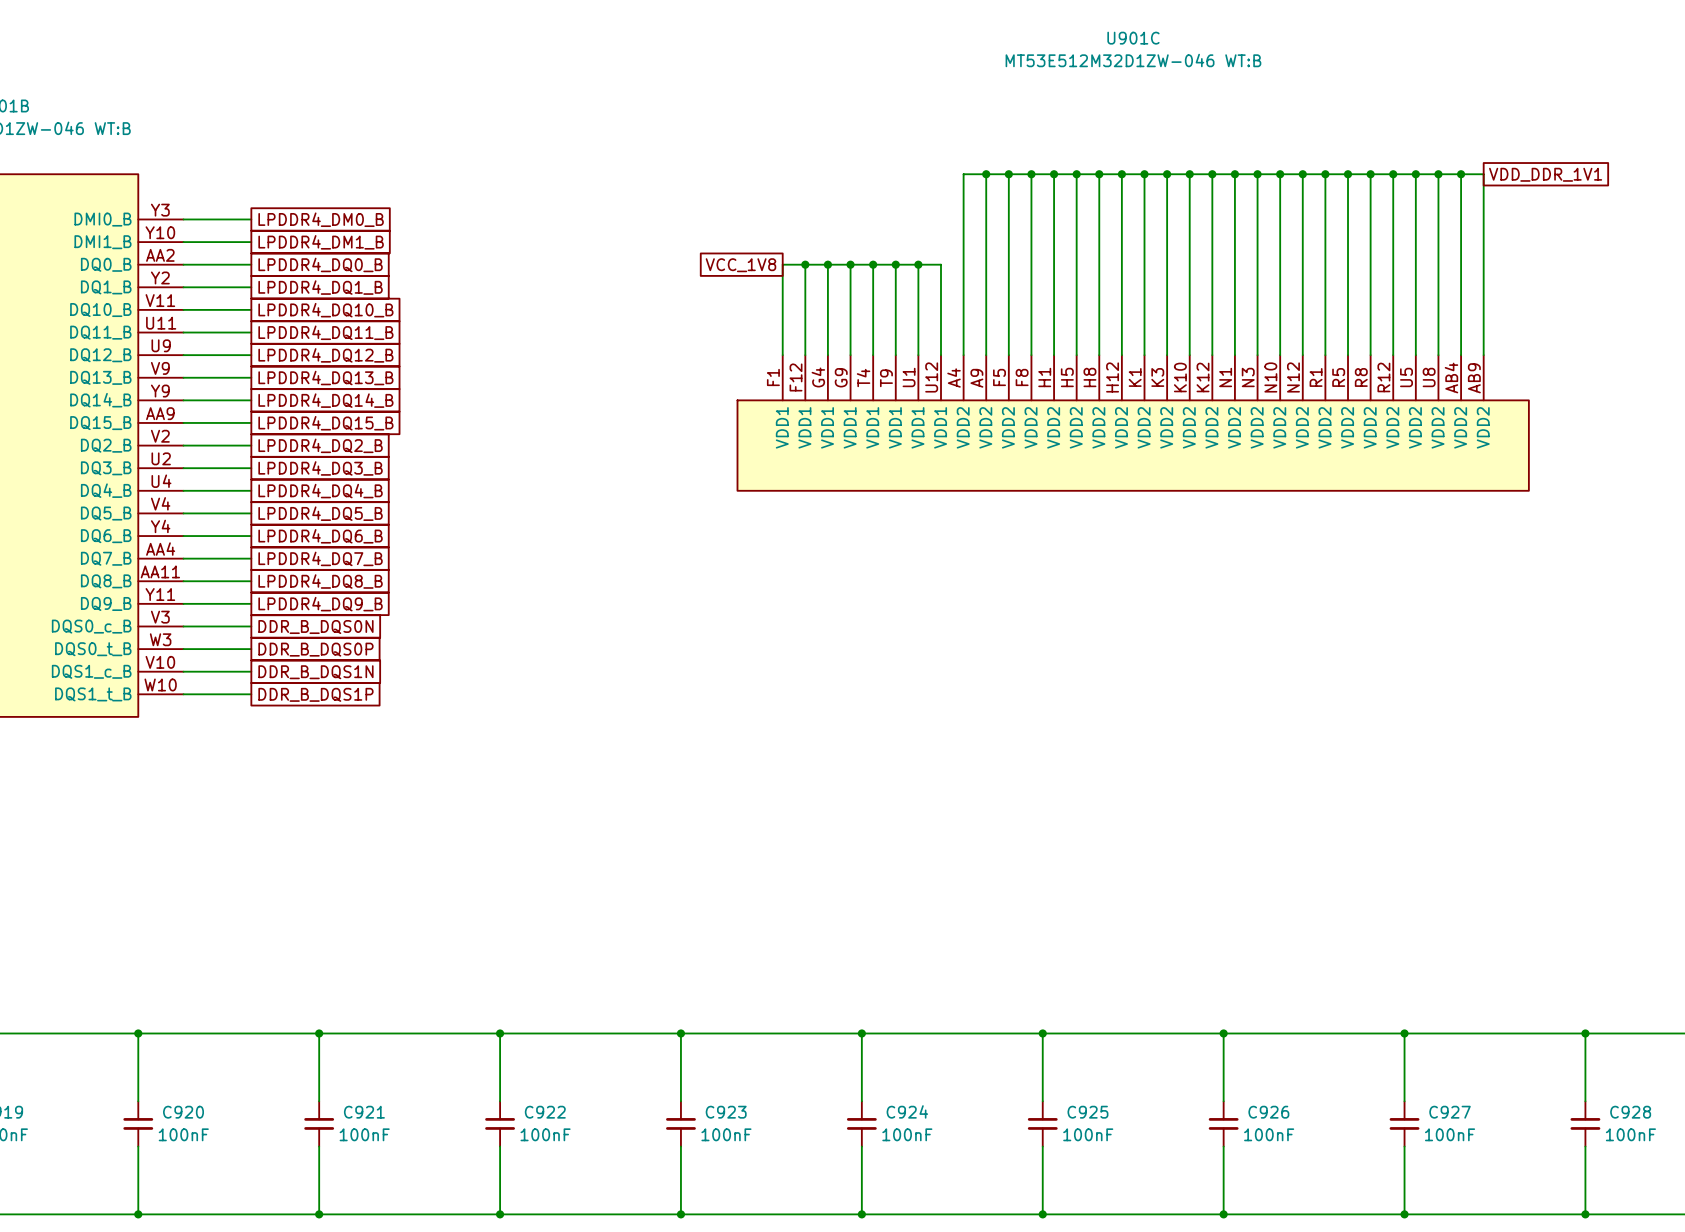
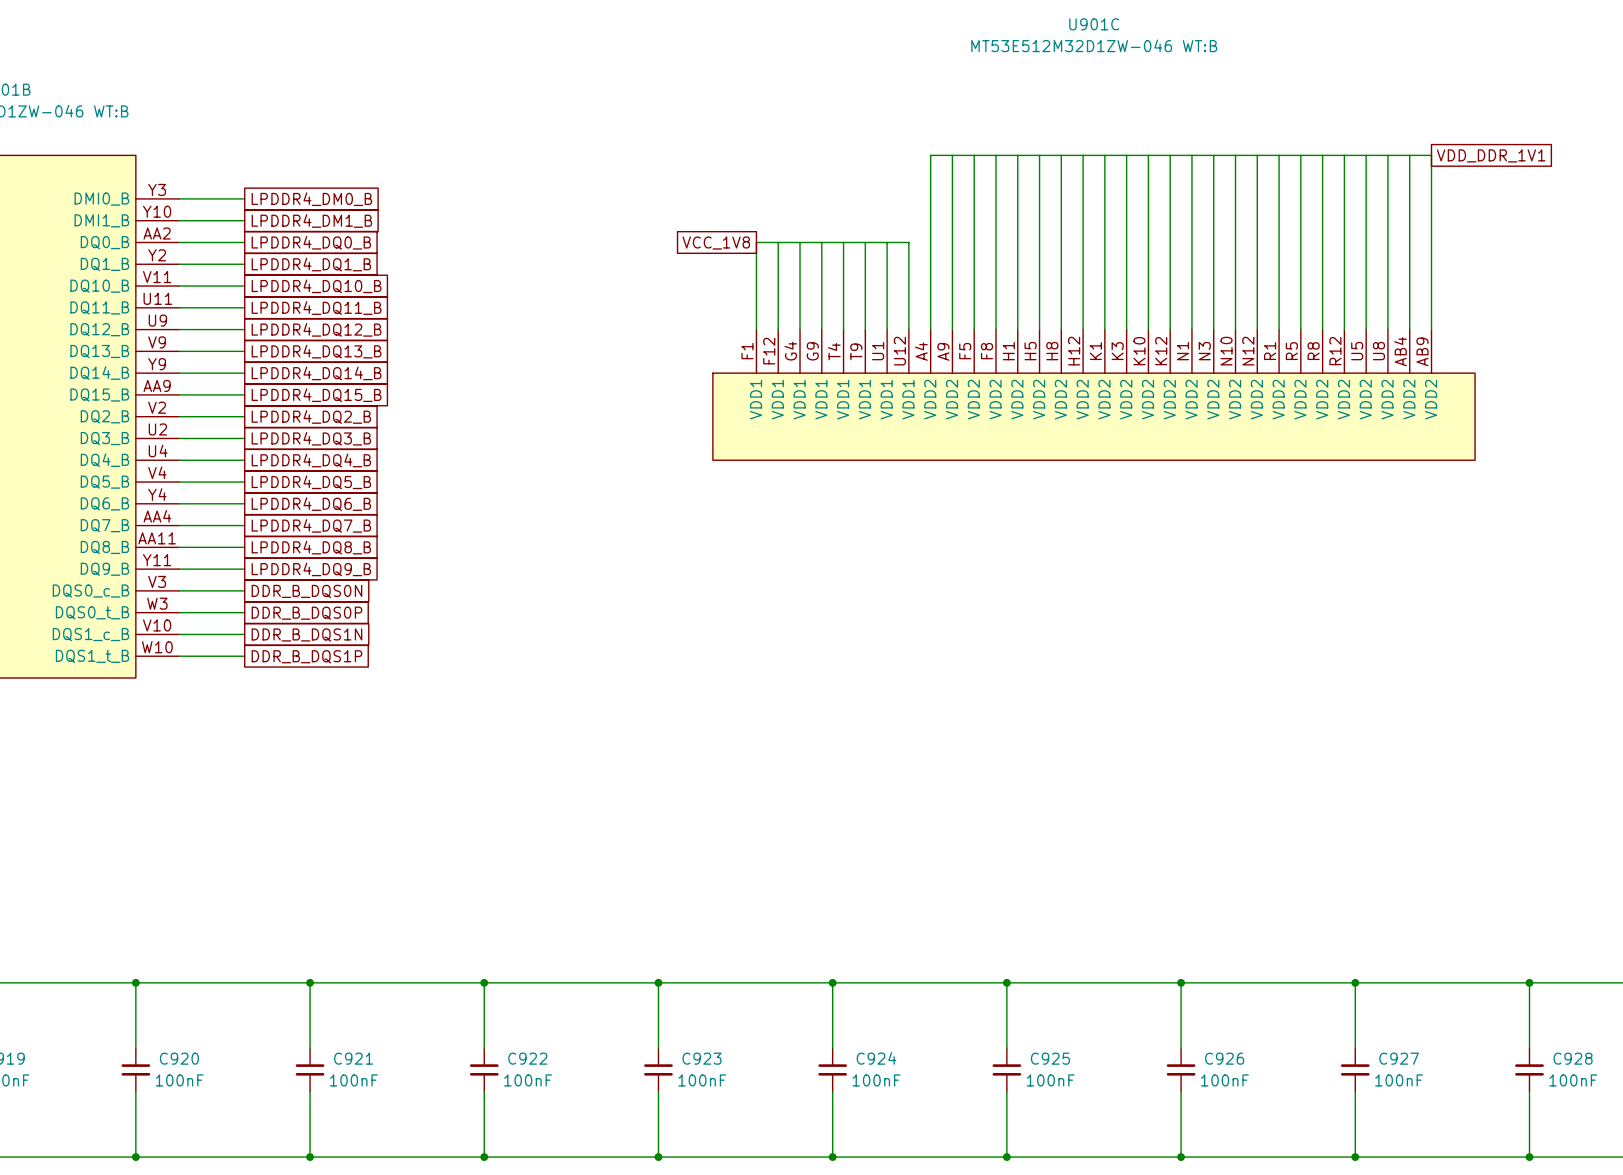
junction: (986, 174) -> none
junction: (1008, 174) -> none
junction: (1031, 174) -> none
junction: (1054, 174) -> none
junction: (1076, 174) -> none
junction: (1099, 174) -> none
junction: (1121, 174) -> none
junction: (1144, 174) -> none
junction: (1167, 174) -> none
junction: (1189, 174) -> none
junction: (1212, 174) -> none
junction: (1234, 174) -> none
junction: (1257, 174) -> none
junction: (1280, 174) -> none
junction: (1302, 174) -> none
junction: (1325, 174) -> none
junction: (1348, 174) -> none
junction: (1370, 174) -> none
junction: (1393, 174) -> none
junction: (1415, 174) -> none
junction: (1438, 174) -> none
junction: (1461, 174) -> none
junction: (805, 264) -> none
junction: (827, 264) -> none
junction: (850, 264) -> none
junction: (873, 264) -> none
junction: (895, 264) -> none
junction: (918, 264) -> none

